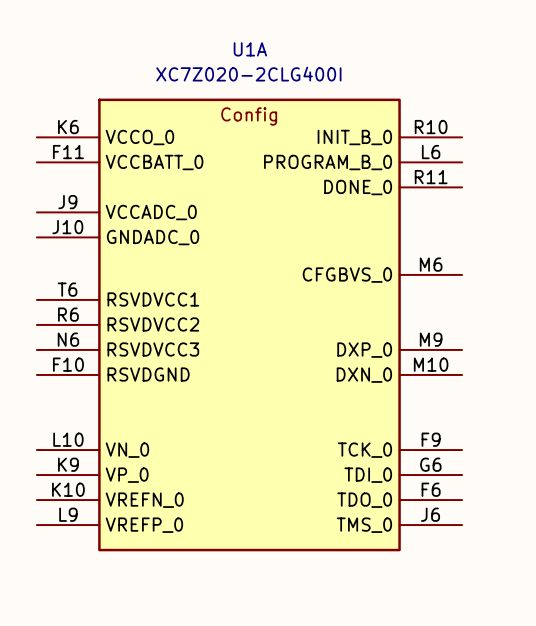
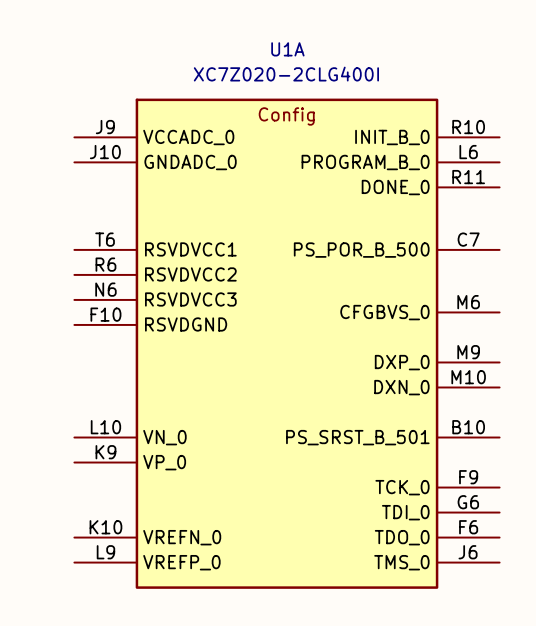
U1A symbol: [36, 98, 463, 552] -> [74, 98, 500, 589]

